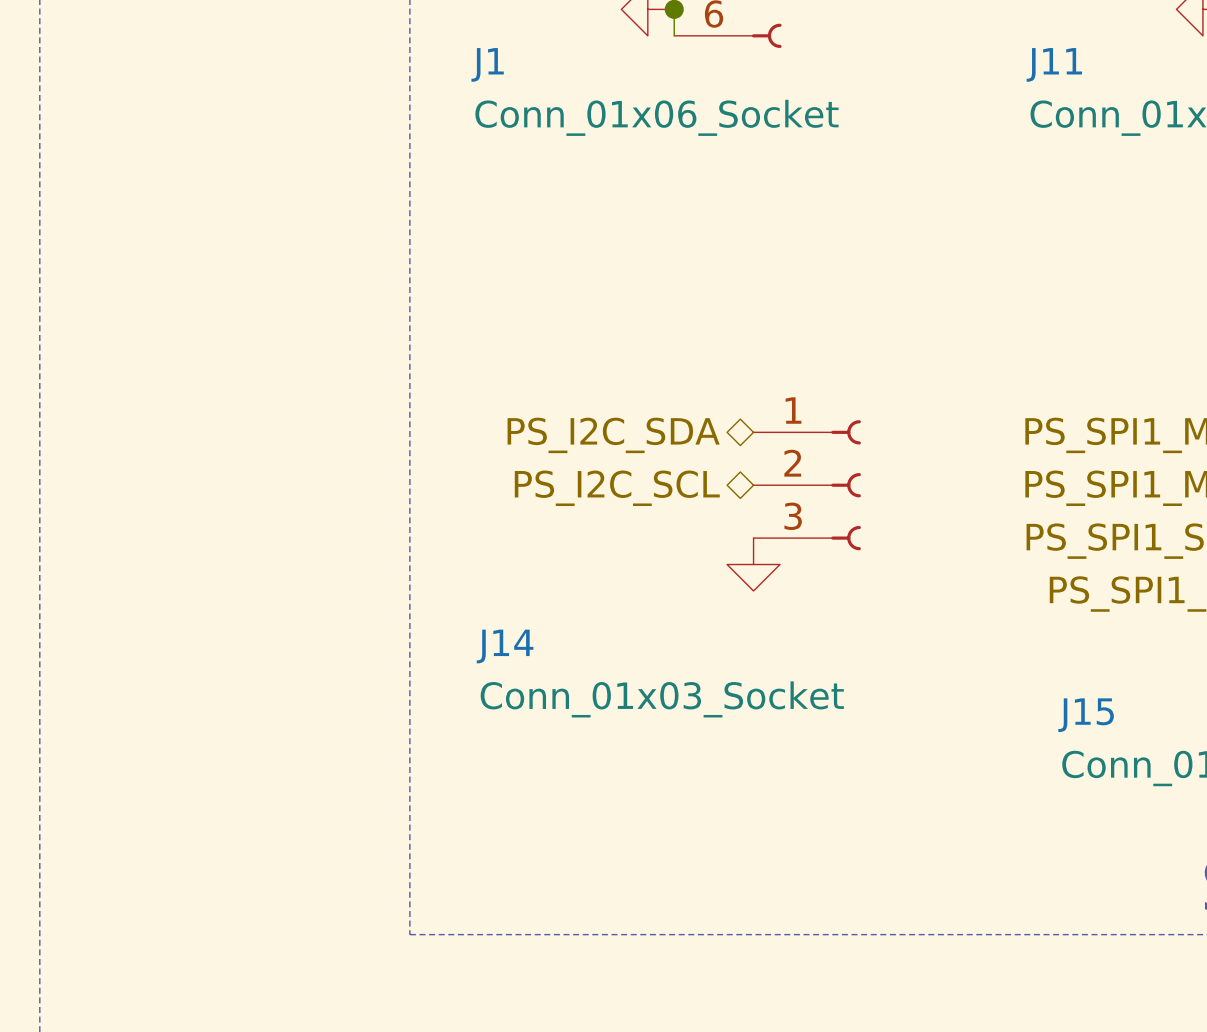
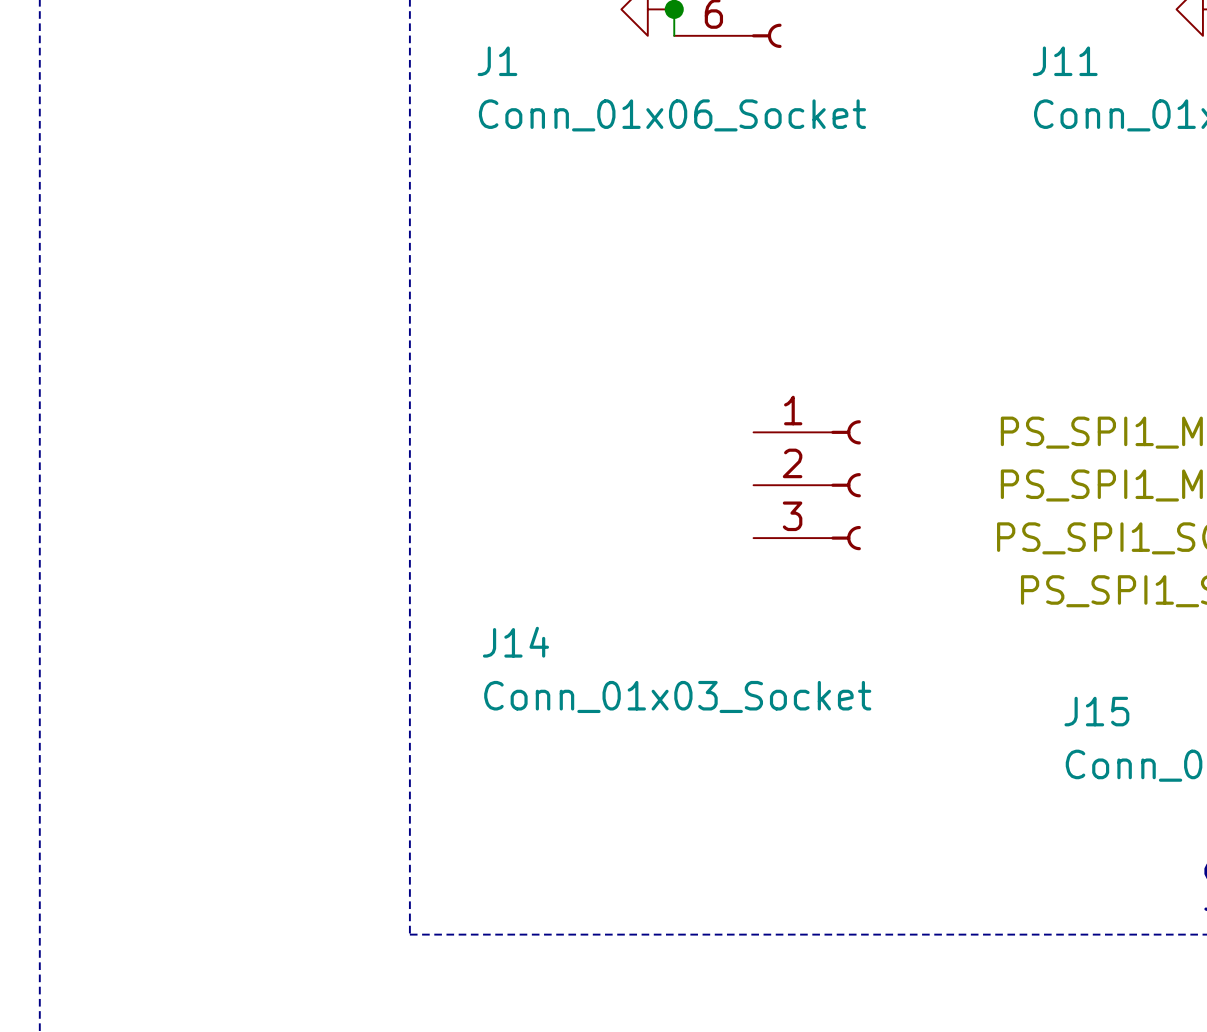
hierarchical label: PS_I2C_SDA (613, 435) -> none
hierarchical label: PS_I2C_SCL (617, 488) -> none
power symbol: (753, 564) -> none

